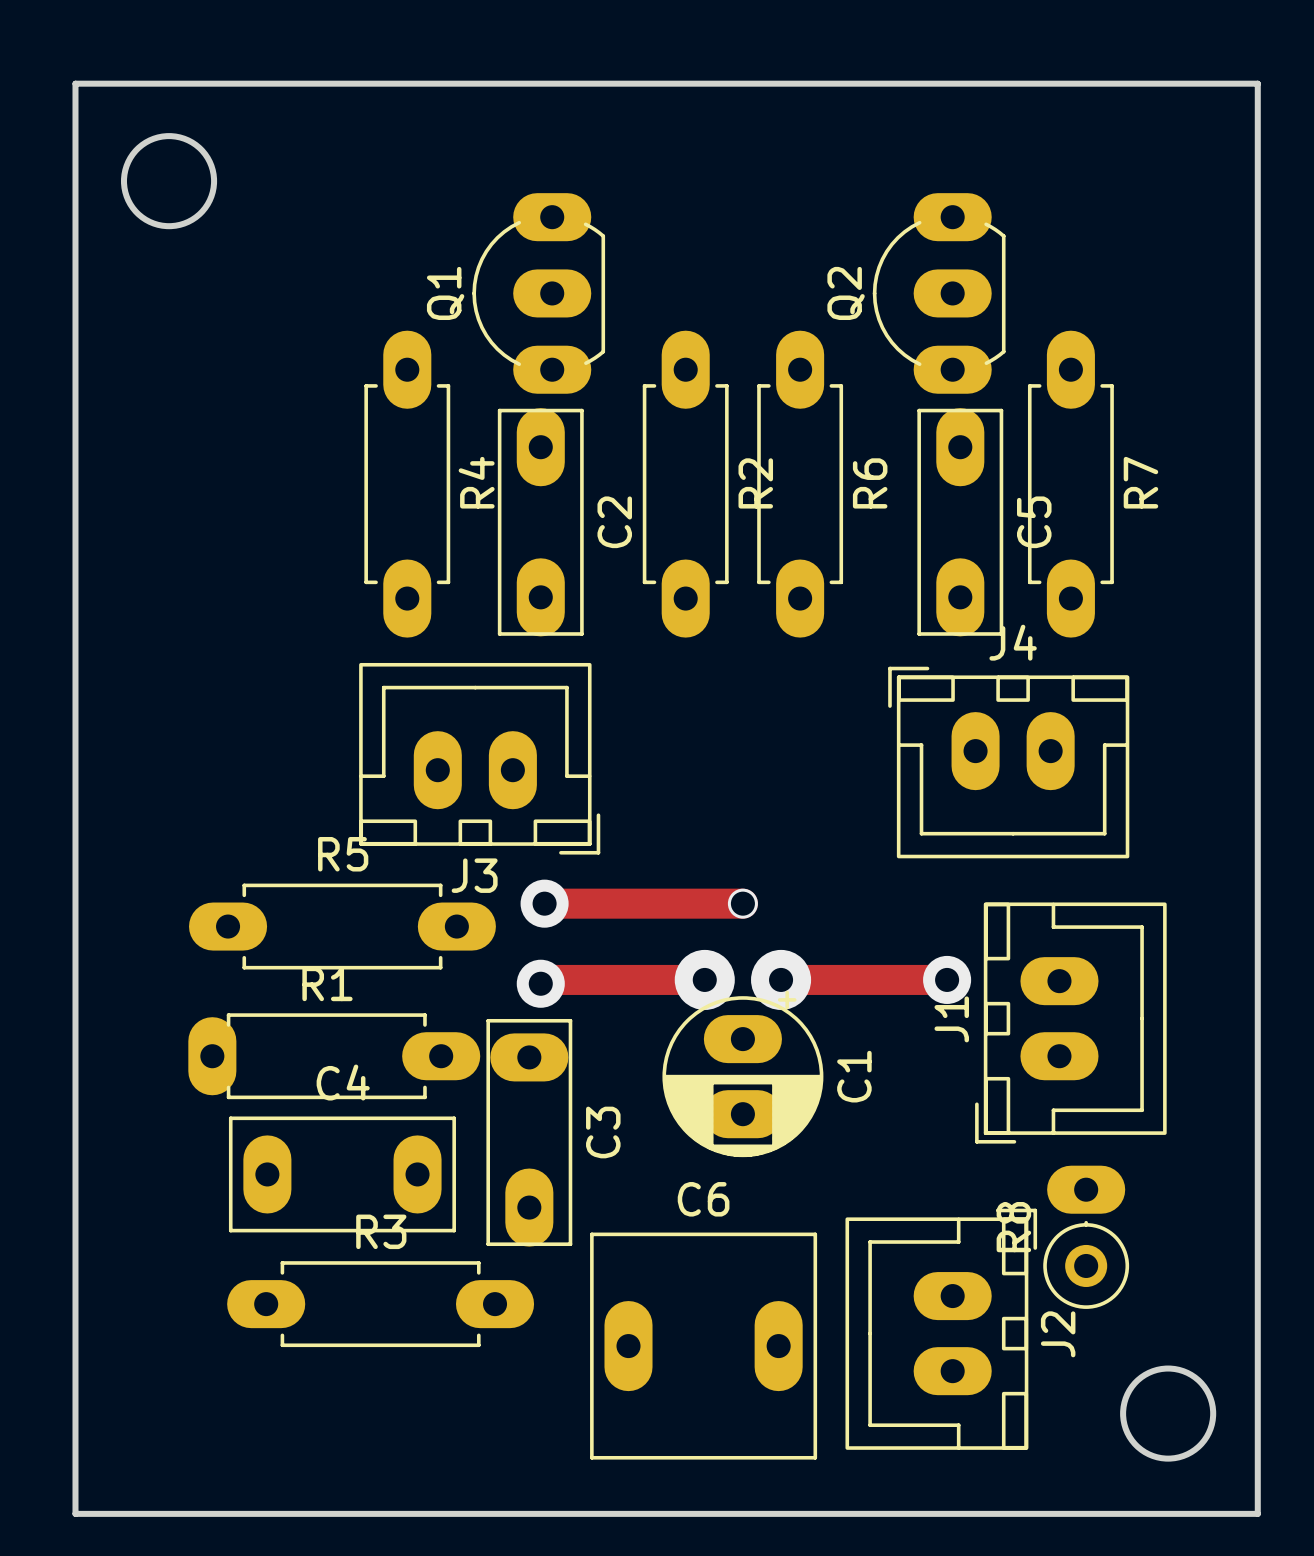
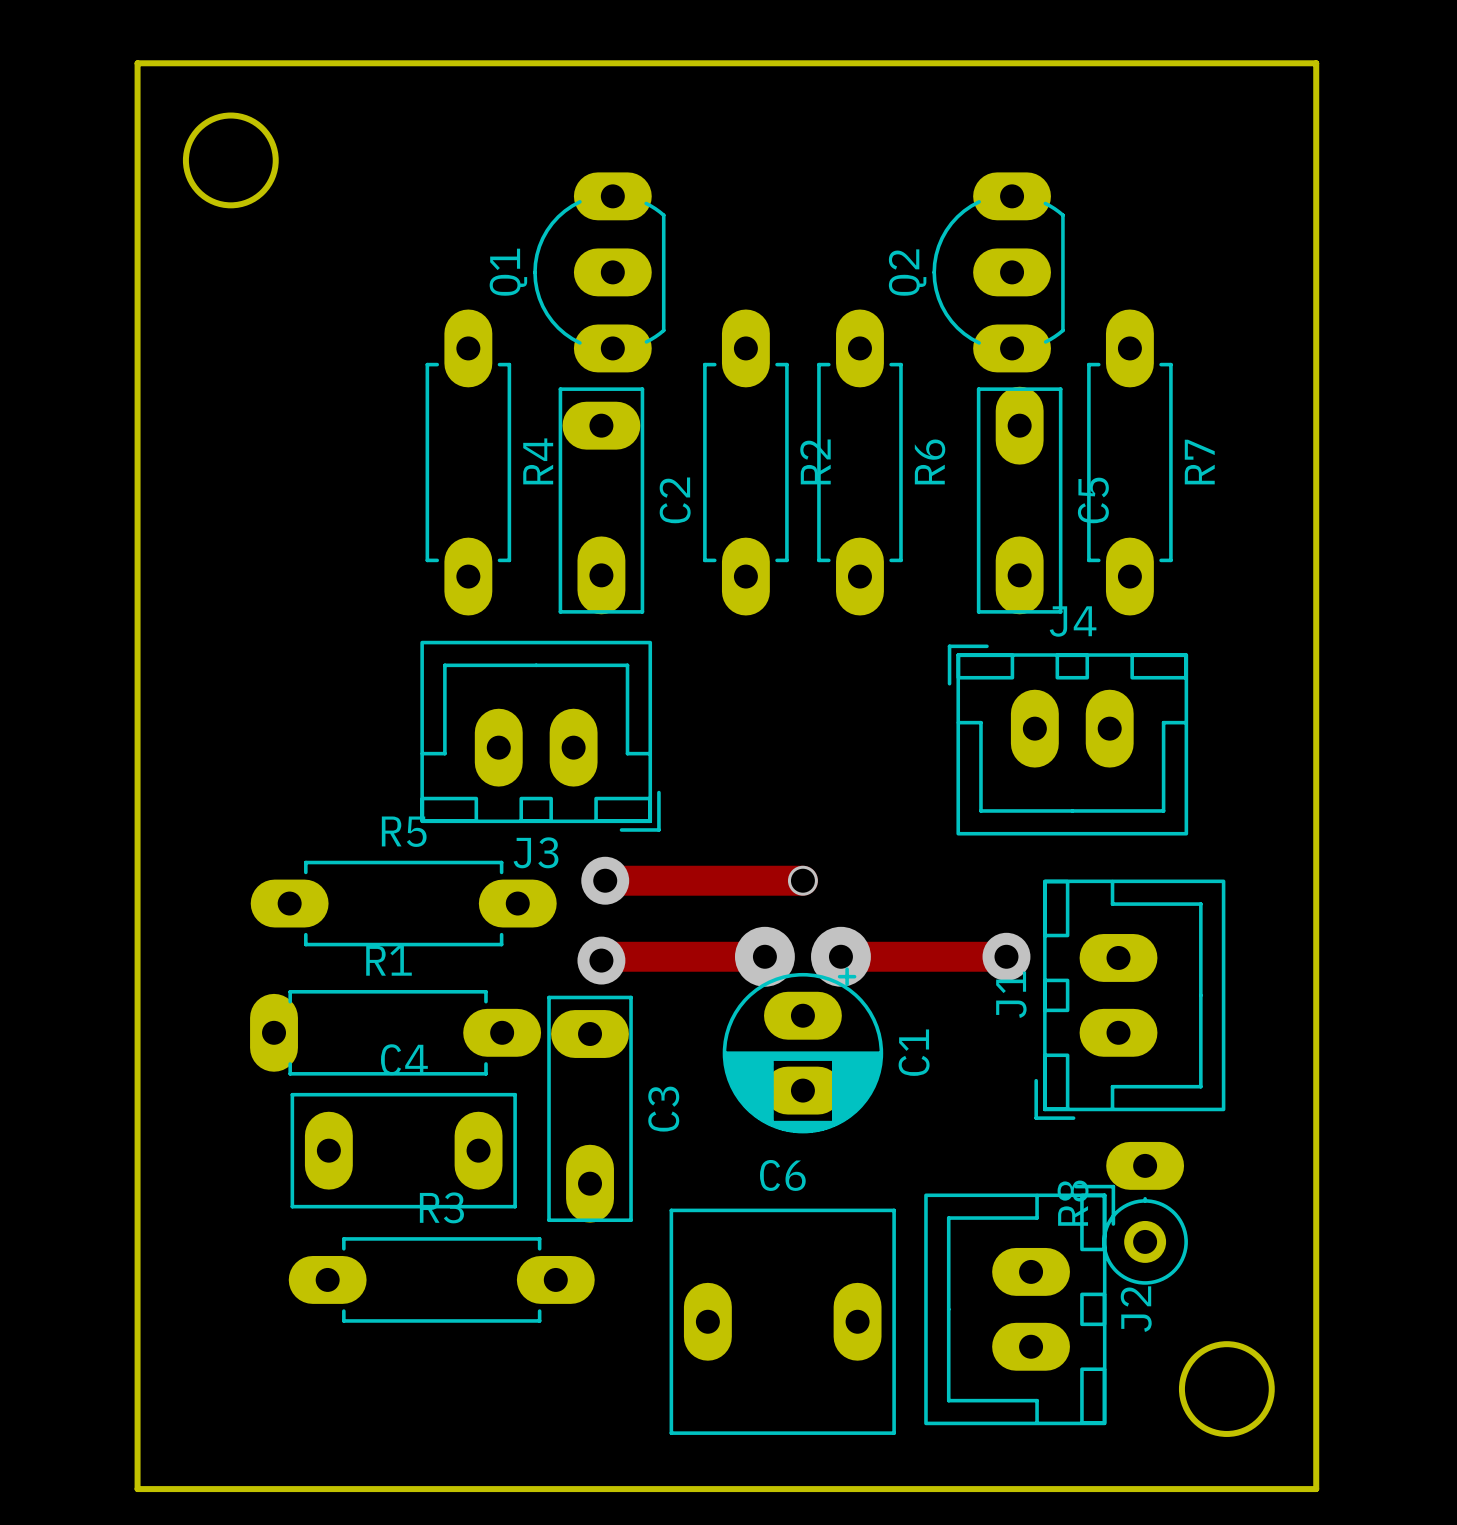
C2 footprint: [497, 408, 584, 637] -> [558, 387, 645, 615]
C6 name position: C6 (703, 1199) -> C6 (782, 1175)
C6 footprint: [590, 1232, 818, 1460] -> [669, 1208, 896, 1435]
J2 position: (941, 1329) -> (1019, 1305)

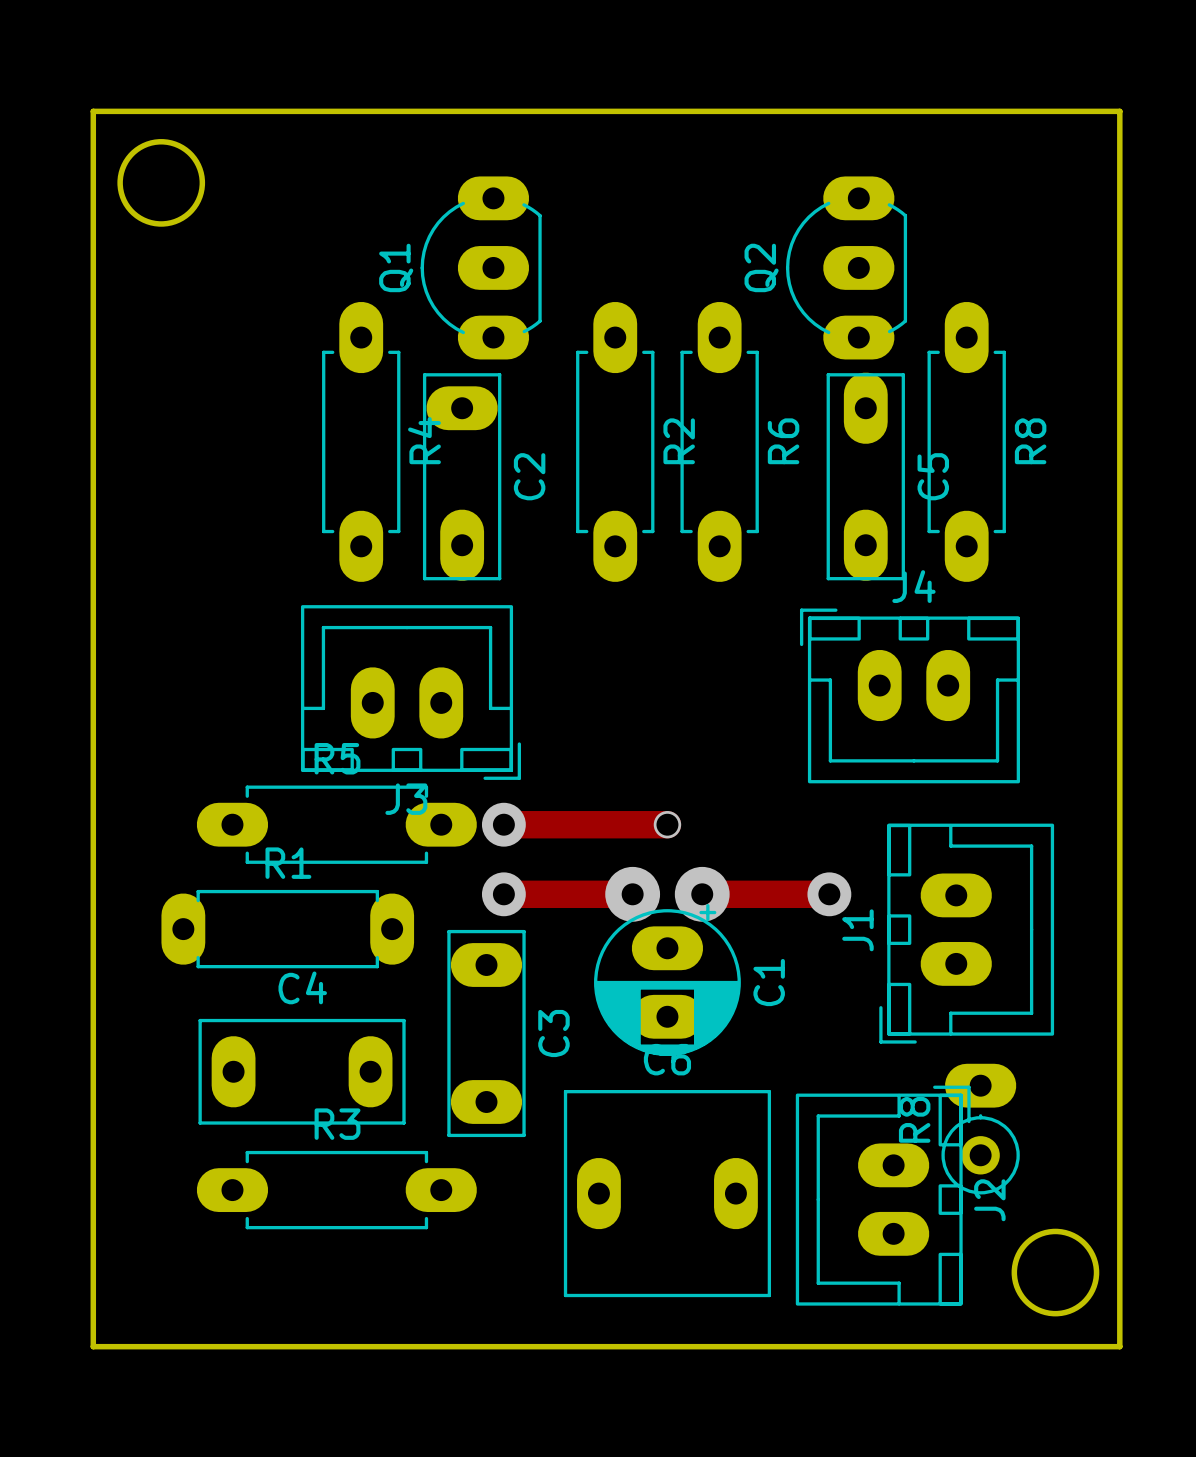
board edge: (137, 63) (1316, 63) (1316, 1489) (137, 1489) (137, 63) -> (93, 111) (93, 1346) (1119, 1346) (1119, 111) (93, 111)
round board edge position: (230, 160) -> (161, 182)
R7 name: R7 (1199, 462) -> R8 (1030, 441)
C2 position: (601, 500) -> (462, 477)
J3 position: (540, 736) -> (410, 692)
via position: (605, 880) -> (503, 824)
R5 position: (403, 903) -> (336, 824)
via position: (1006, 956) -> (829, 894)
via position: (601, 960) -> (503, 894)
R1 footprint: [250, 990, 542, 1076] -> [161, 889, 415, 969]
C3 footprint: [547, 995, 633, 1223] -> [447, 929, 526, 1138]
J2 position: (1019, 1305) -> (883, 1195)
C6 position: (782, 1321) -> (667, 1193)
round board edge position: (1226, 1389) -> (1055, 1272)

